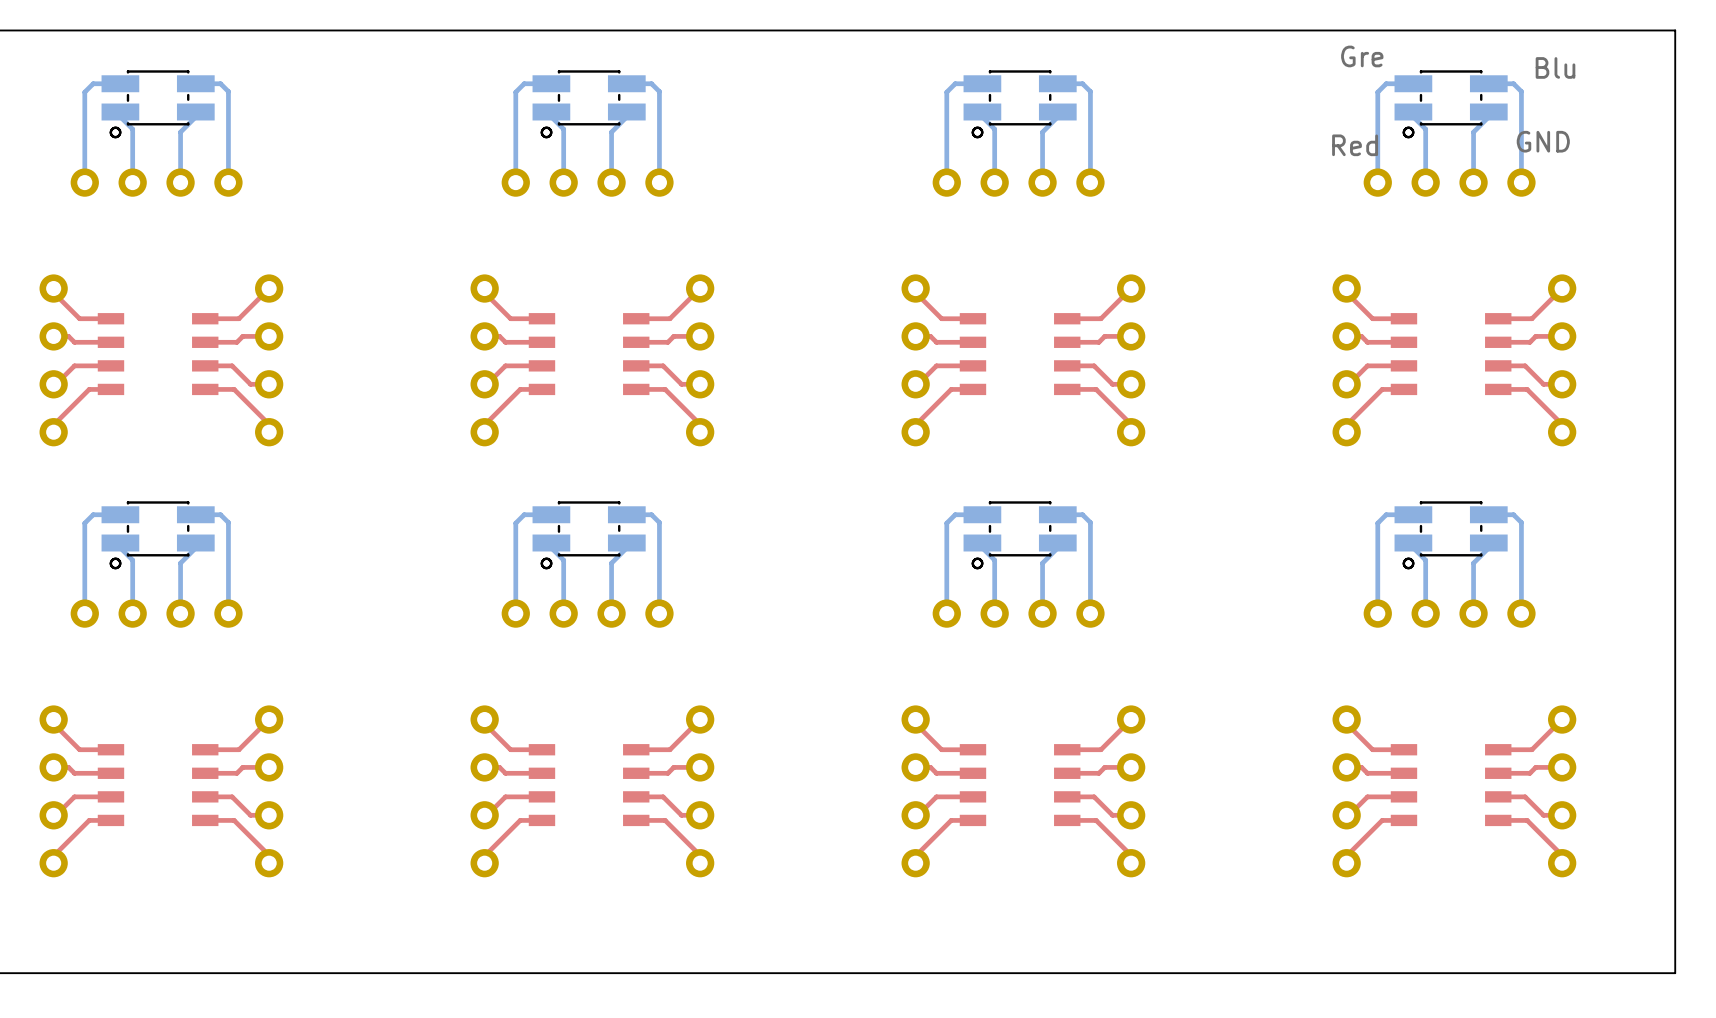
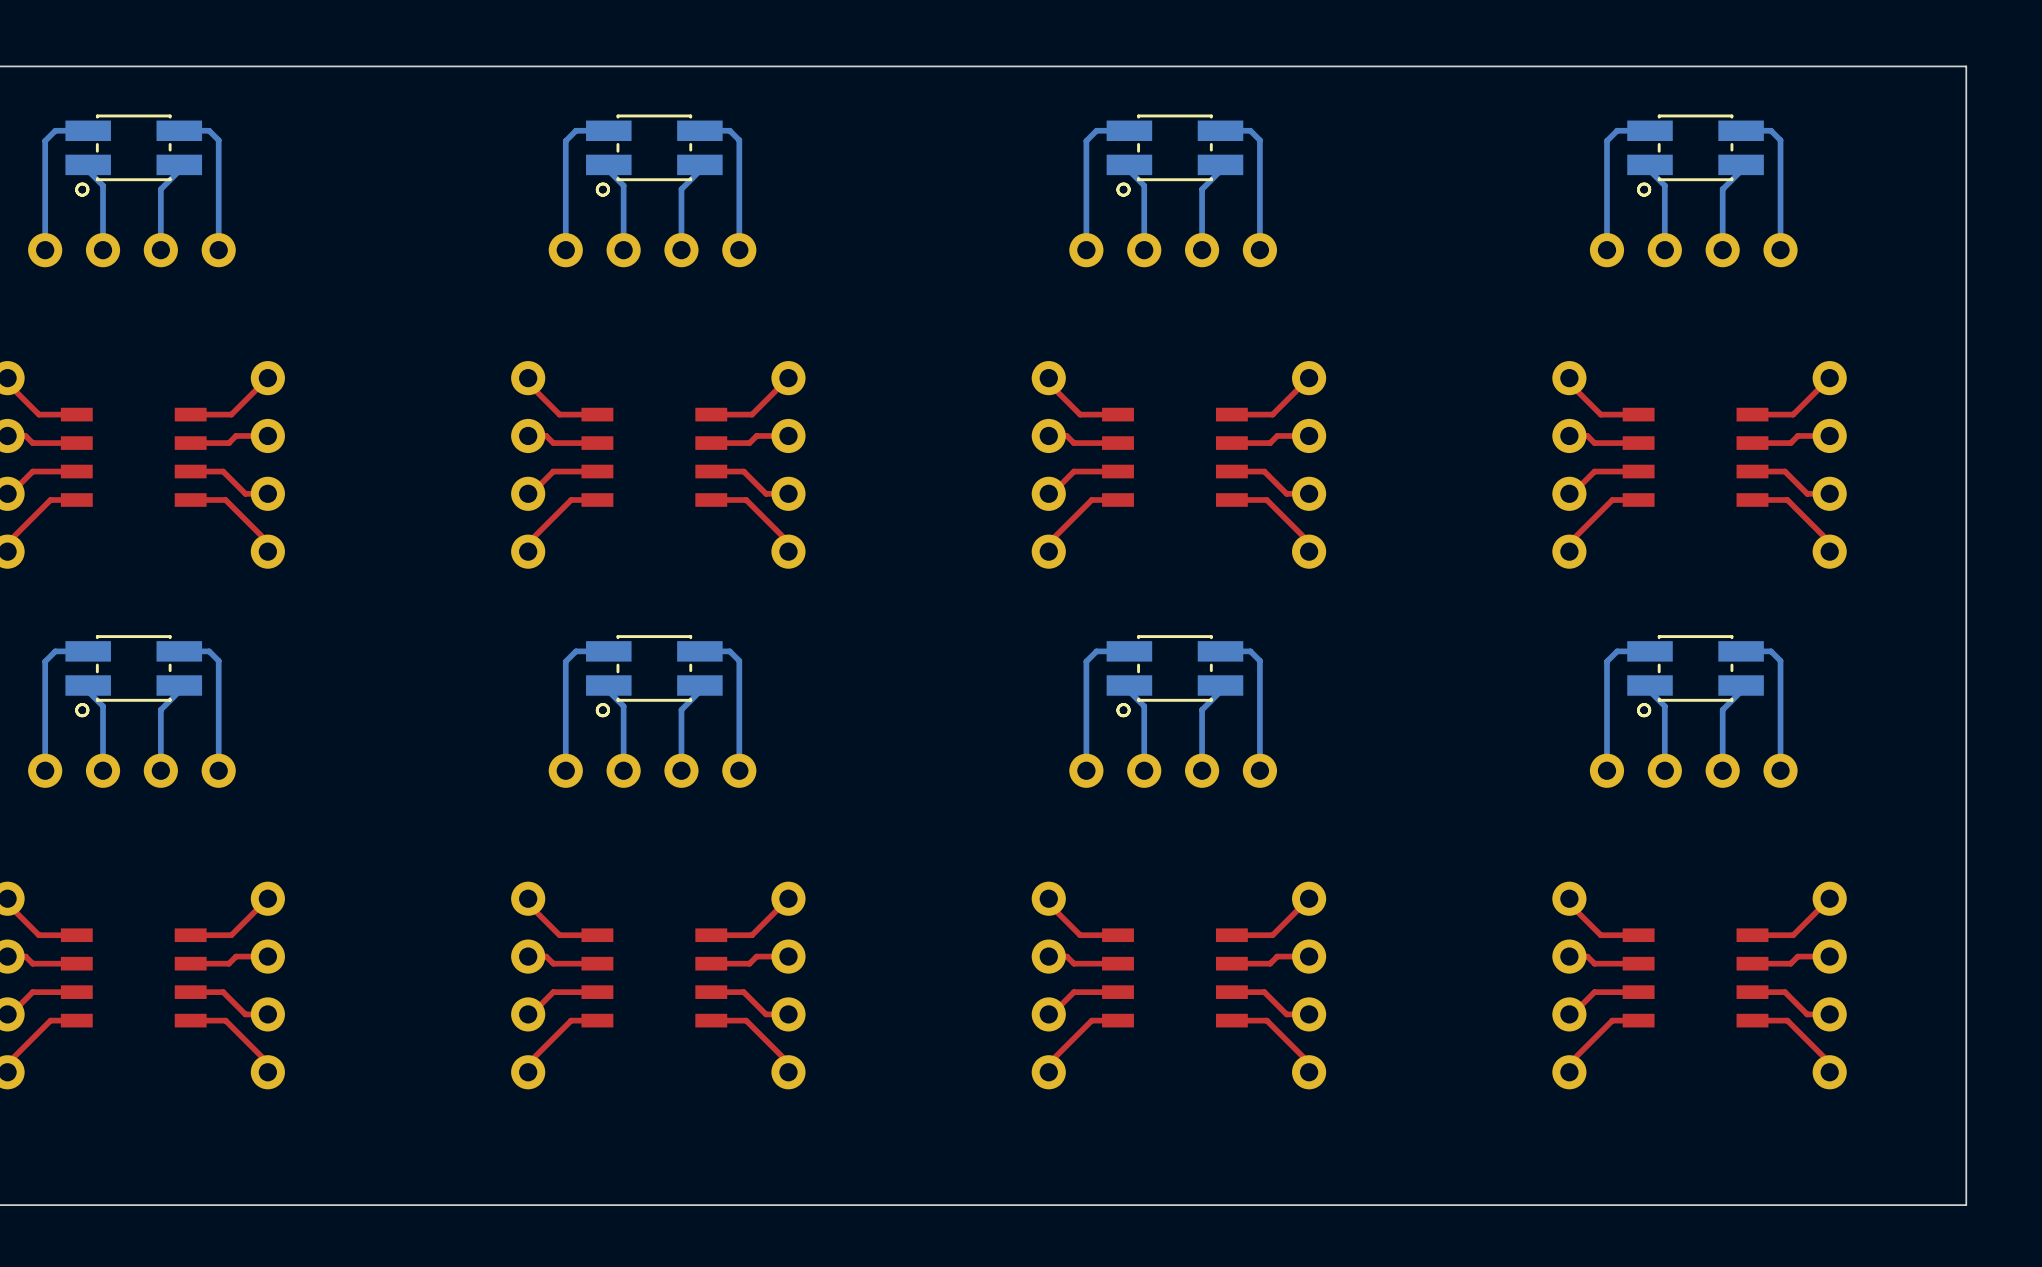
part text: Gre (1362, 56) -> none
part text: Blu (1555, 67) -> none
part text: GND (1543, 141) -> none
part text: Red (1355, 145) -> none

